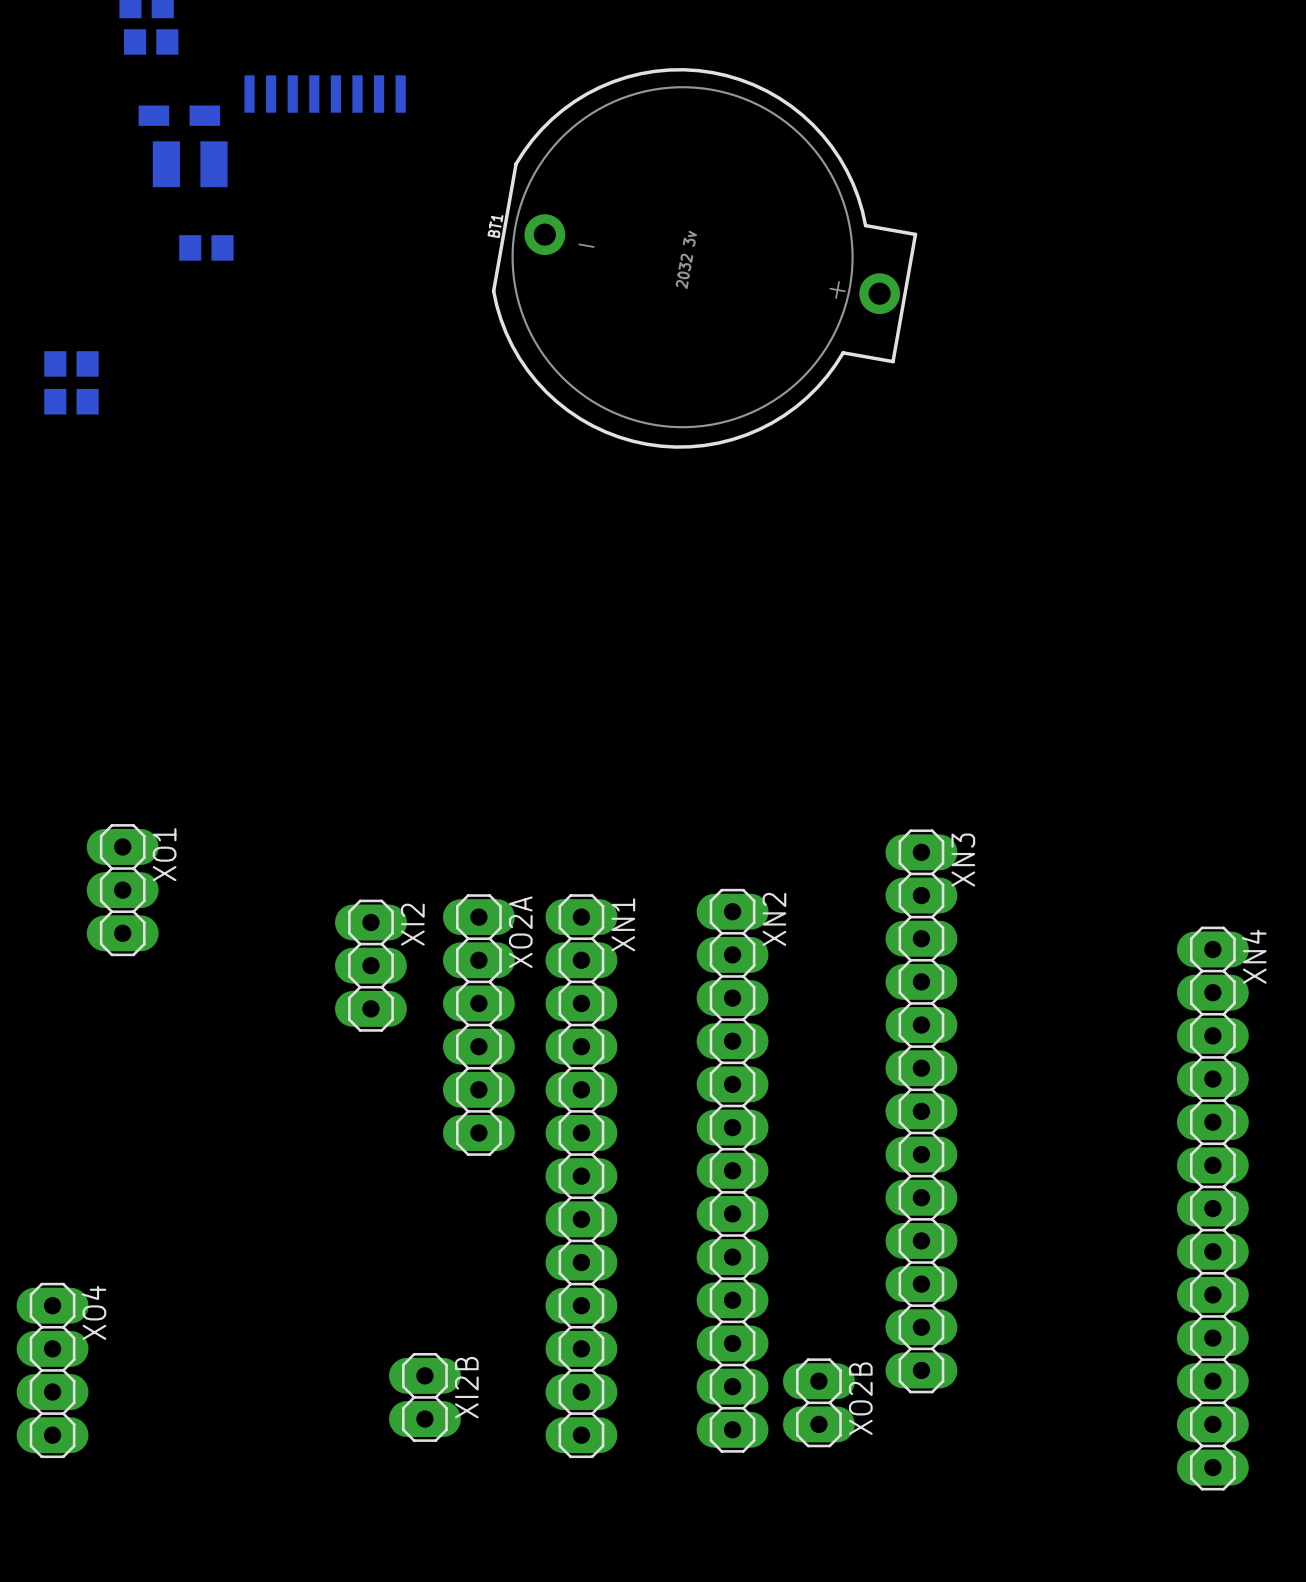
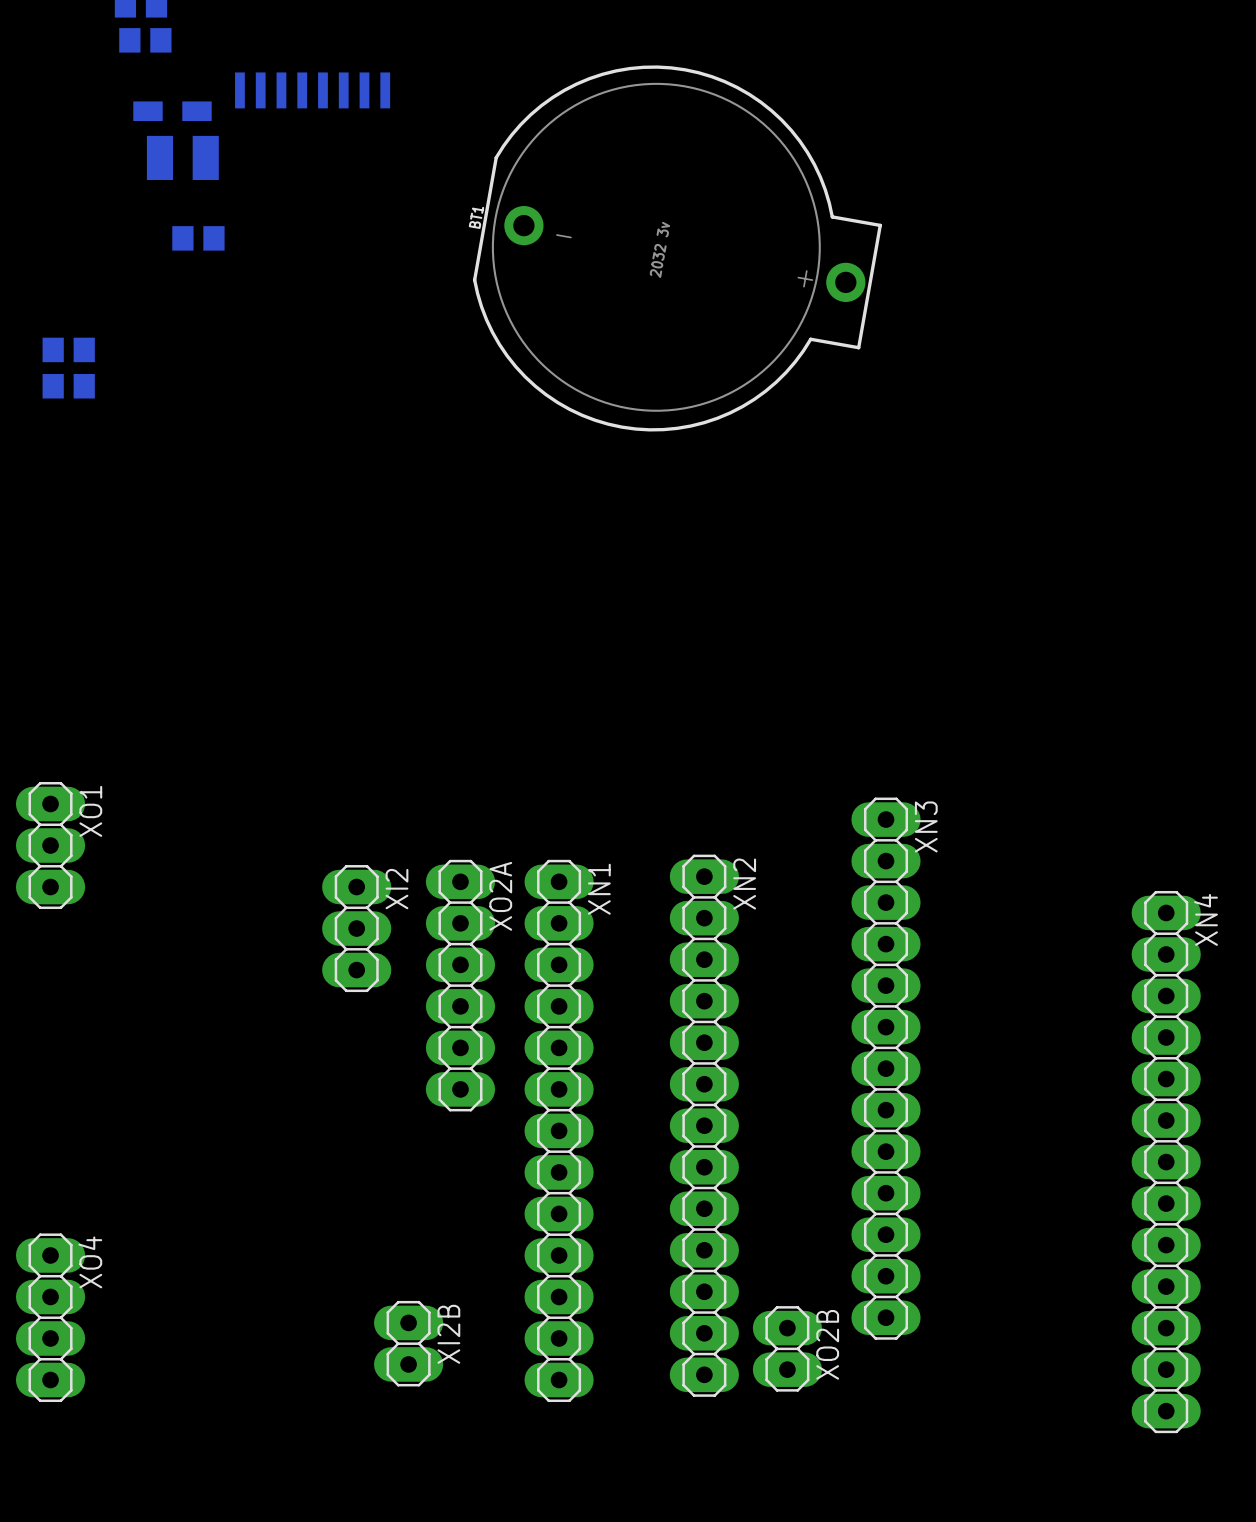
XO1 position: (122, 890) -> (50, 845)

